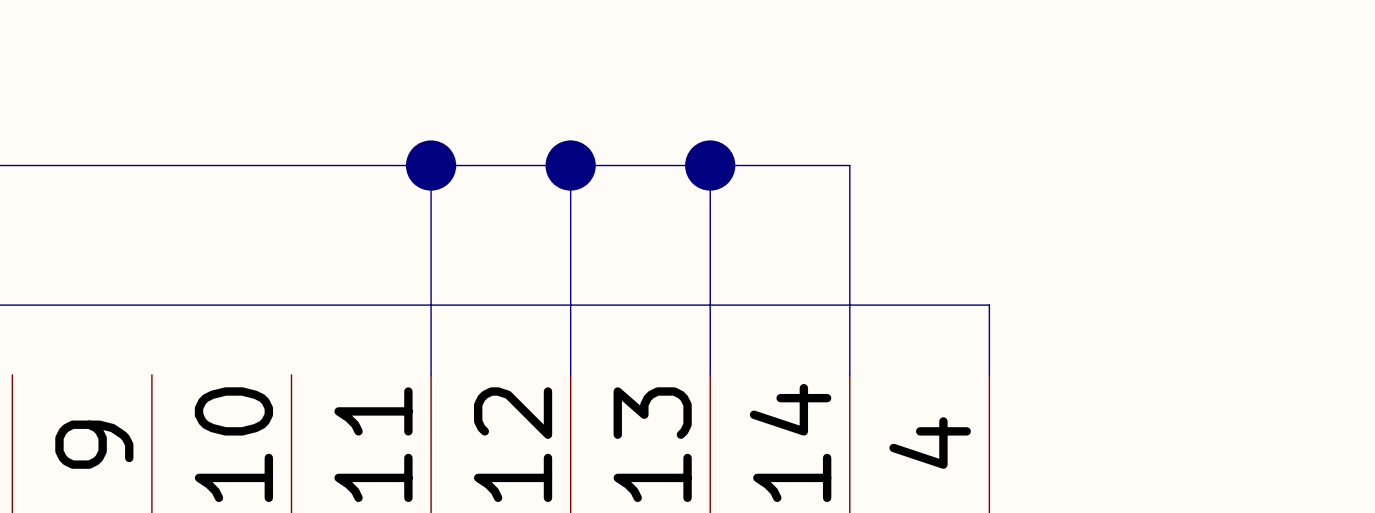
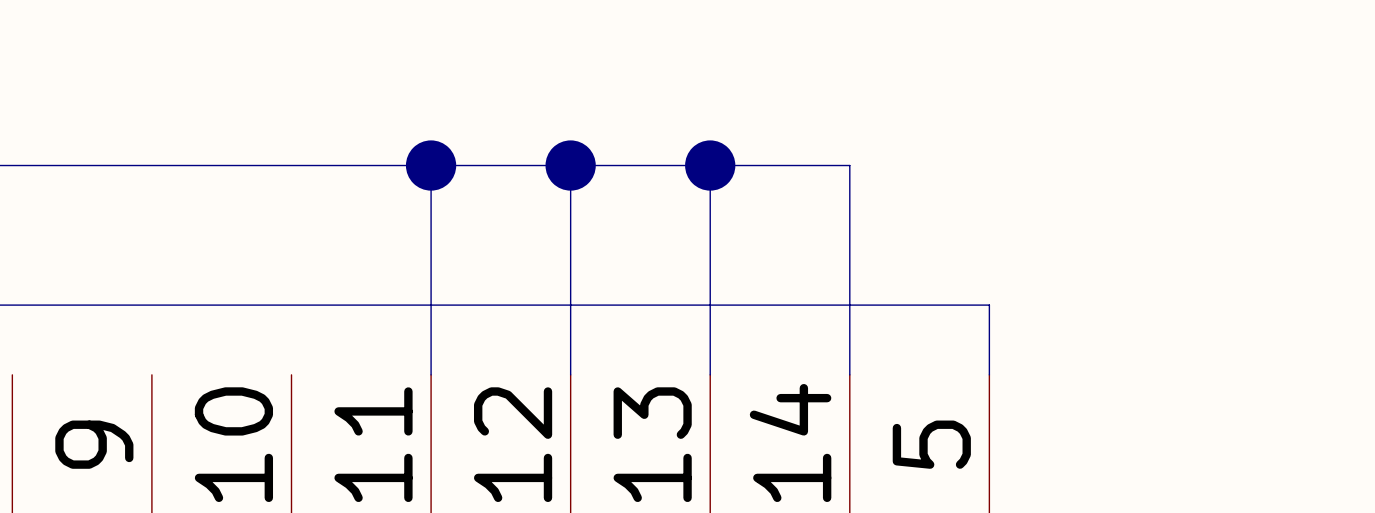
part pin number: 4 (930, 443) -> 5 (931, 444)

